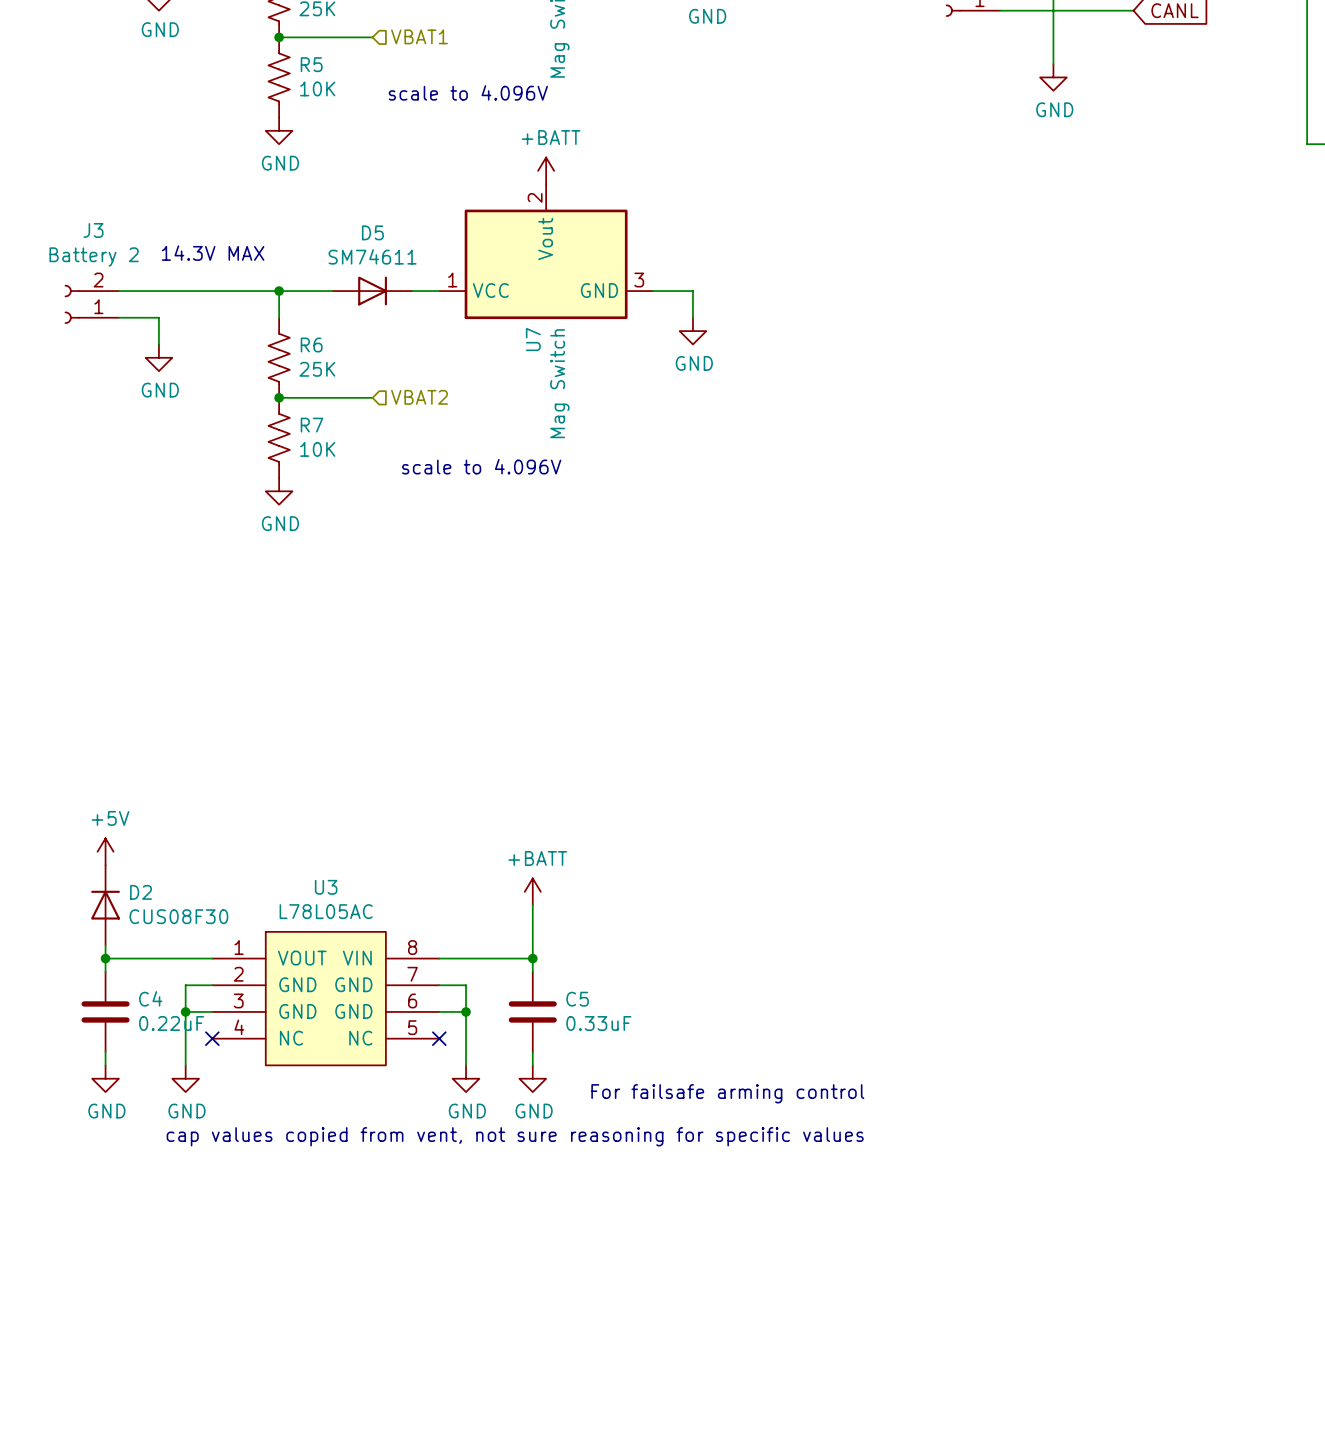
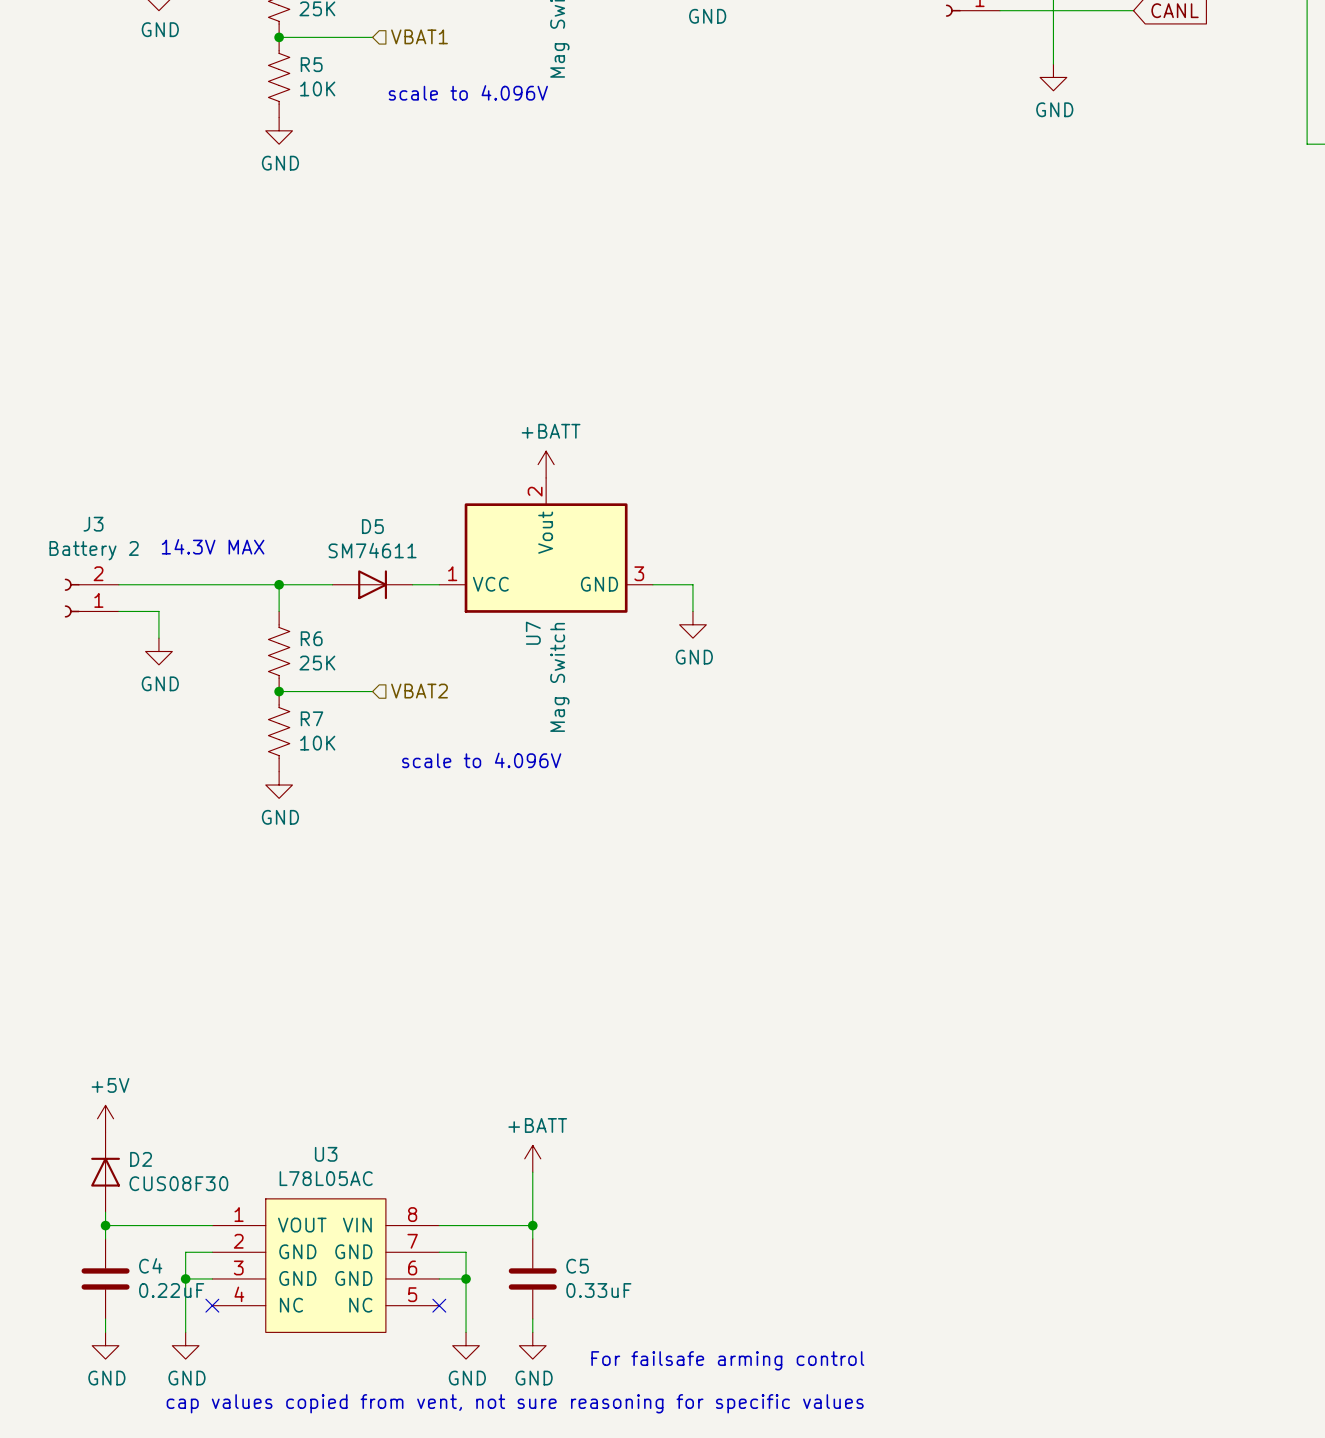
power symbol: +BATT (546, 170) -> none
U7 position: (546, 251) -> (546, 545)
text: 14.3V MAX (213, 253) -> none
wire: (118, 291) (332, 291) -> none
wire: (279, 291) (279, 317) -> none
junction: (279, 291) -> none
D5 position: (372, 291) -> (372, 584)
wire: (412, 291) (439, 291) -> none
wire: (652, 291) (692, 291) (692, 317) -> none
J3 position: (91, 304) -> (91, 598)
wire: (118, 317) (158, 317) (158, 344) -> none
power symbol: GND (692, 331) -> none
power symbol: GND (158, 357) -> none
R6 position: (279, 357) -> (279, 651)
wire: (279, 397) (372, 397) -> none
junction: (279, 397) -> none
hierarchical label: VBAT2 (419, 397) -> none
R7 position: (279, 437) -> (279, 731)
power symbol: none -> +BATT (546, 464)
text: scale to 4.096V (481, 466) -> none
power symbol: GND (279, 491) -> none
text: none -> 14.3V MAX (213, 546)
wire: none -> (118, 584) (332, 584)
wire: none -> (279, 584) (279, 611)
junction: none -> (279, 584)
wire: none -> (412, 584) (439, 584)
wire: none -> (652, 584) (692, 584) (692, 611)
wire: none -> (118, 611) (158, 611) (158, 638)
power symbol: none -> GND (692, 624)
power symbol: none -> GND (158, 651)
wire: none -> (279, 691) (372, 691)
junction: none -> (279, 691)
hierarchical label: none -> VBAT2 (419, 691)
text: none -> scale to 4.096V (481, 760)
power symbol: none -> GND (279, 785)
power symbol: +5V (105, 851) -> none
power symbol: +BATT (532, 891) -> none
D2 position: (105, 905) -> (105, 1172)
wire: (532, 905) (532, 971) -> none
wire: (105, 945) (105, 971) -> none
wire: (105, 958) (212, 958) -> none
junction: (105, 958) -> none
wire: (439, 958) (532, 958) -> none
junction: (532, 958) -> none
wire: (212, 985) (185, 985) (185, 1065) -> none
wire: (439, 985) (466, 985) (466, 1065) -> none
U3 position: (325, 998) -> (325, 1265)
C4 position: (105, 1011) -> (105, 1278)
wire: (185, 1011) (212, 1011) -> none
junction: (185, 1011) -> none
wire: (439, 1011) (466, 1011) -> none
junction: (466, 1011) -> none
C5 position: (532, 1011) -> (532, 1278)
no-connect mark: (212, 1038) -> none
no-connect mark: (439, 1038) -> none
wire: (105, 1052) (105, 1065) -> none
wire: (532, 1052) (532, 1065) -> none
power symbol: GND (105, 1078) -> none
power symbol: GND (185, 1078) -> none
power symbol: GND (466, 1078) -> none
power symbol: GND (532, 1078) -> none
text: For failsafe arming control (727, 1093) -> none
power symbol: none -> +5V (105, 1118)
text: cap values copied from vent, not sure reasoning for specific values (515, 1136) -> none
power symbol: none -> +BATT (532, 1158)
wire: none -> (532, 1172) (532, 1238)
wire: none -> (105, 1212) (105, 1238)
wire: none -> (105, 1225) (212, 1225)
junction: none -> (105, 1225)
wire: none -> (439, 1225) (532, 1225)
junction: none -> (532, 1225)
wire: none -> (212, 1252) (185, 1252) (185, 1332)
wire: none -> (439, 1252) (466, 1252) (466, 1332)
wire: none -> (185, 1278) (212, 1278)
junction: none -> (185, 1278)
wire: none -> (439, 1278) (466, 1278)
junction: none -> (466, 1278)
no-connect mark: none -> (212, 1305)
no-connect mark: none -> (439, 1305)
wire: none -> (105, 1319) (105, 1332)
wire: none -> (532, 1319) (532, 1332)
power symbol: none -> GND (105, 1345)
power symbol: none -> GND (185, 1345)
power symbol: none -> GND (466, 1345)
power symbol: none -> GND (532, 1345)
text: none -> For failsafe arming control (727, 1360)
text: none -> cap values copied from vent, not sure reasoning for specific values (515, 1403)

